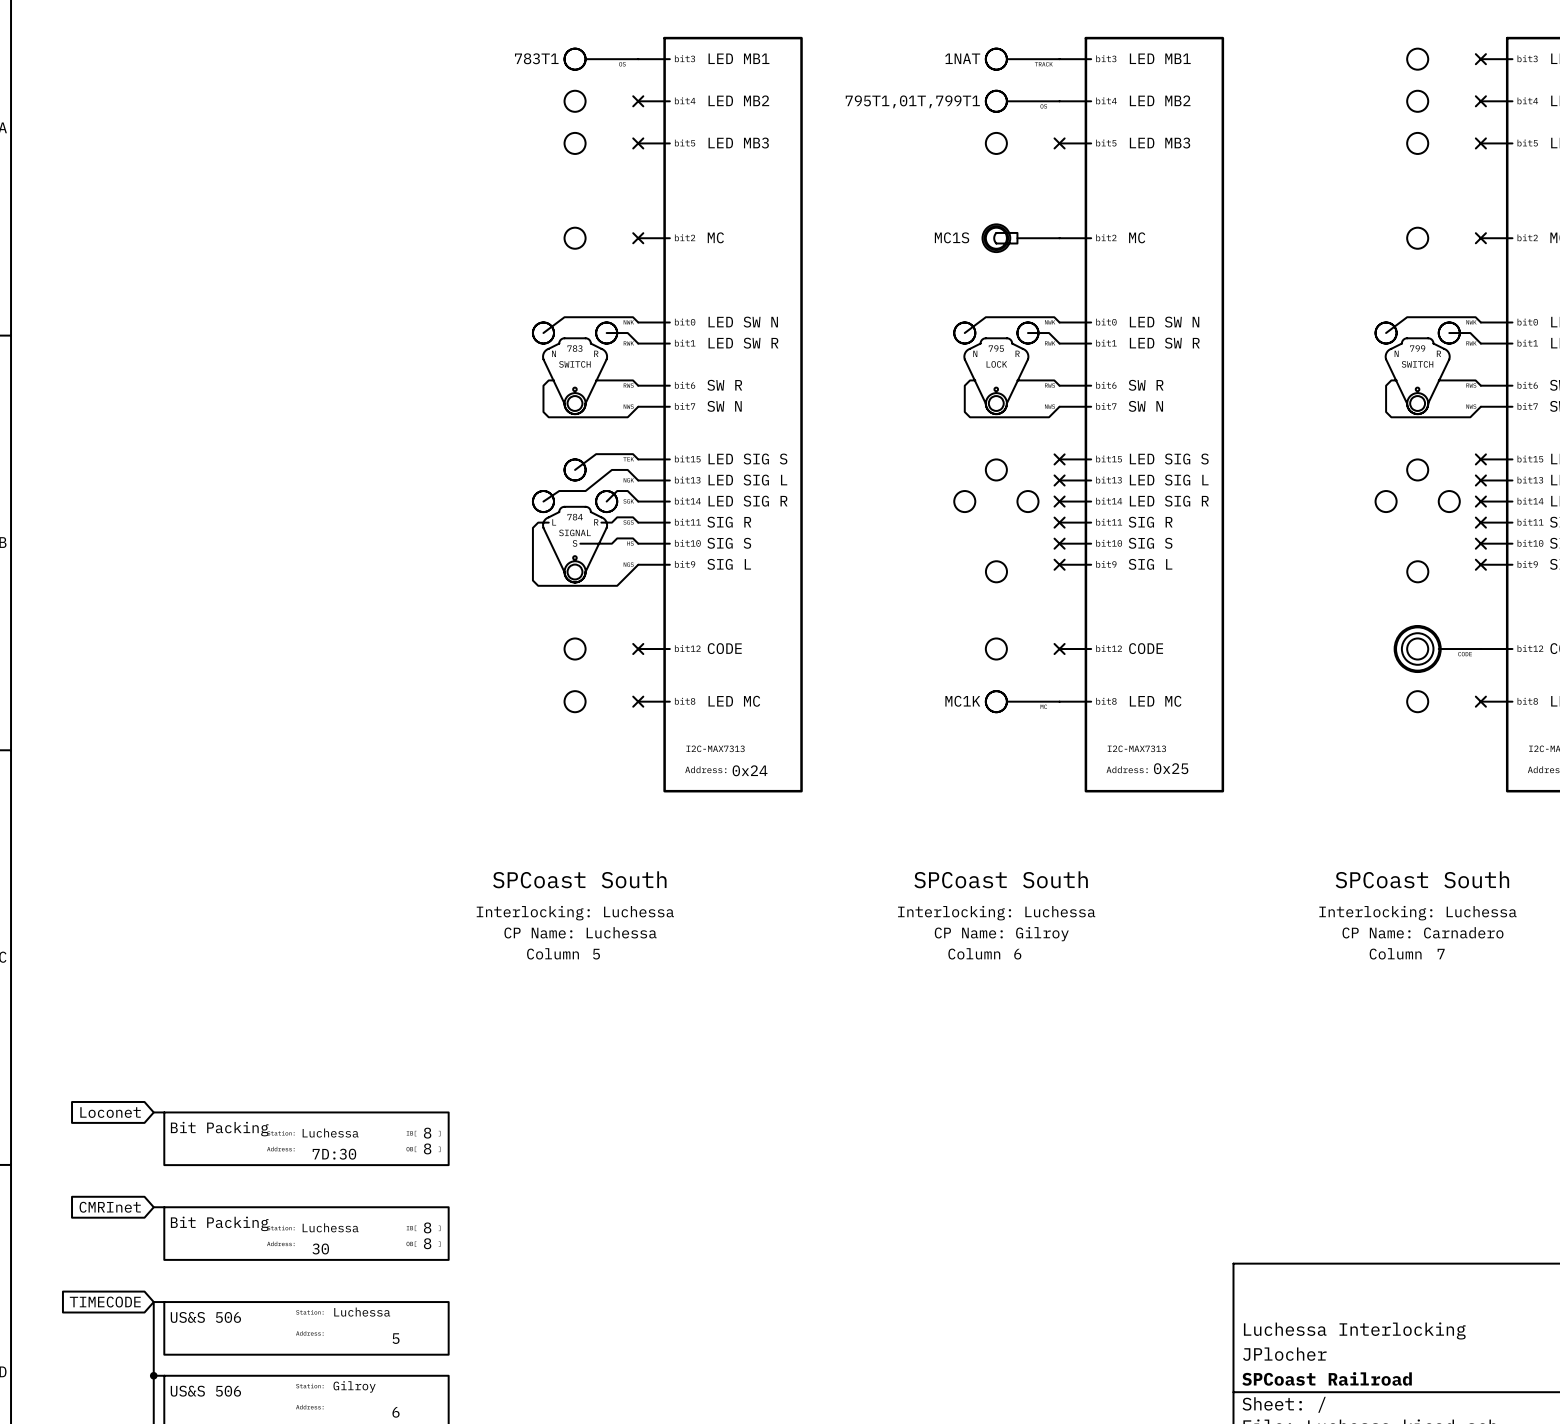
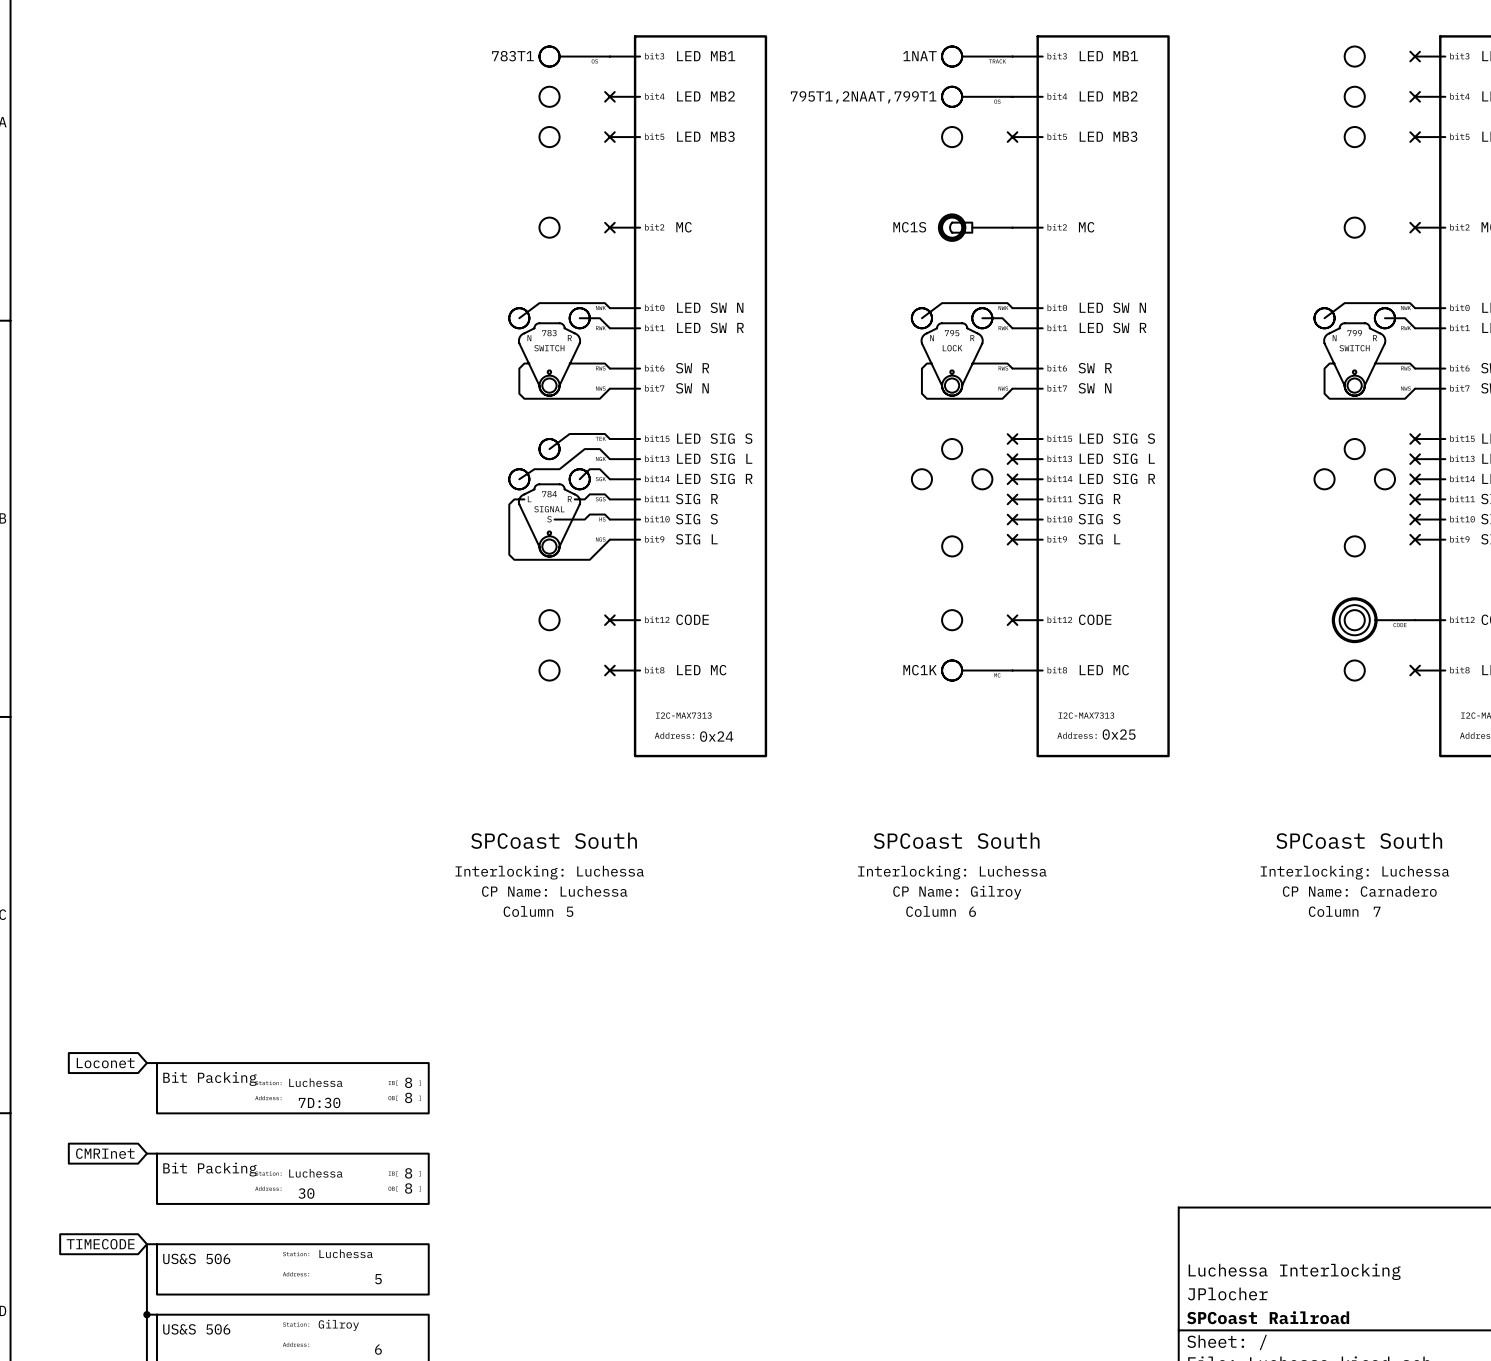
part text: 795T1,01T,799T1 (912, 101) -> 795T1,2NAAT,799T1 (863, 97)

